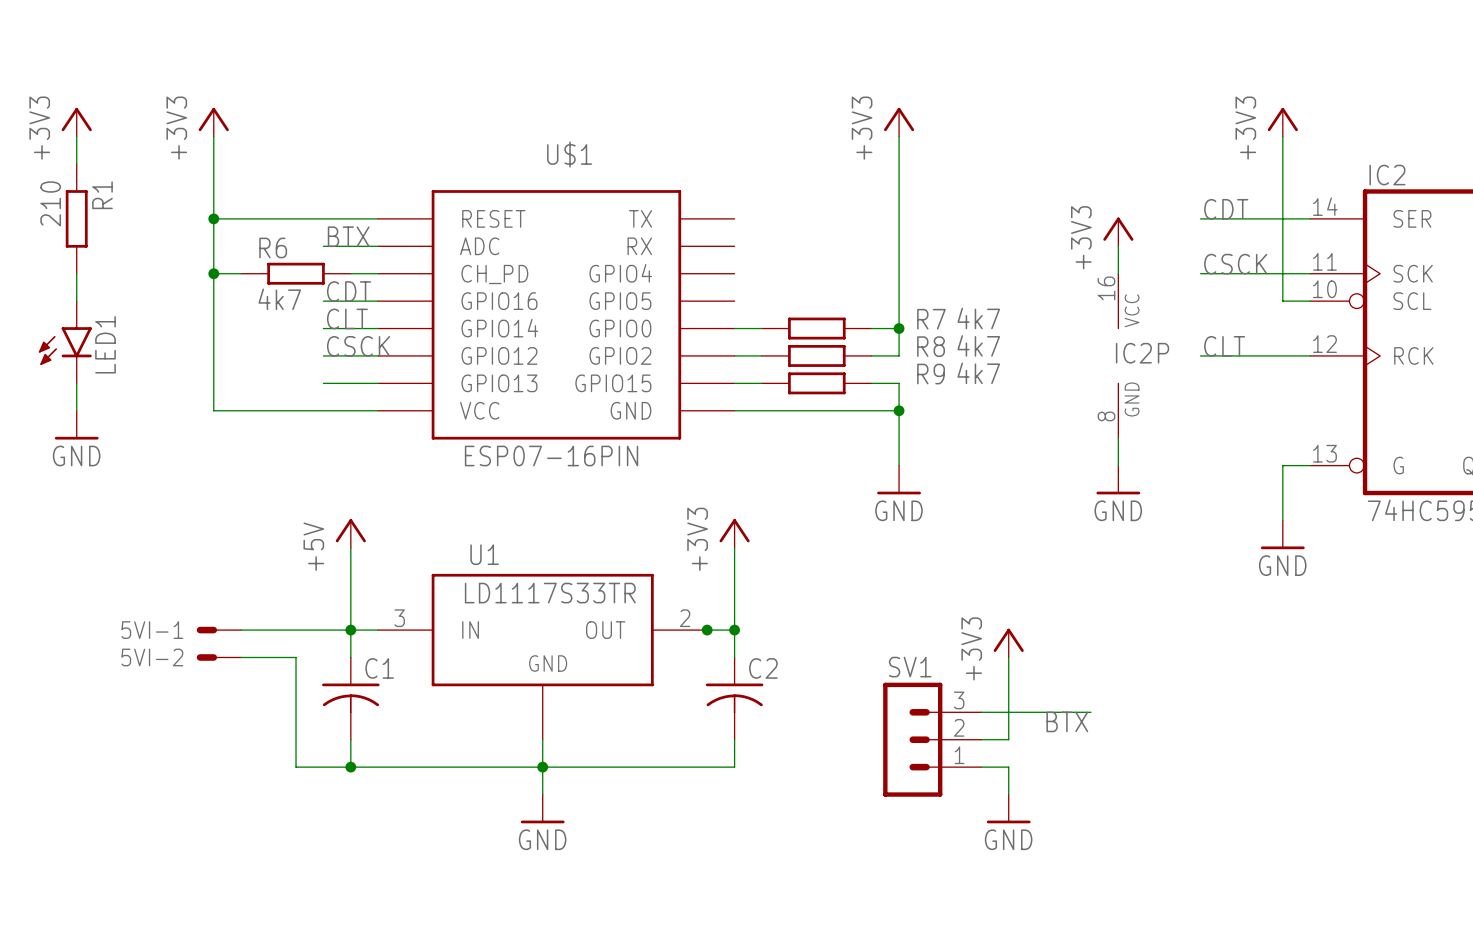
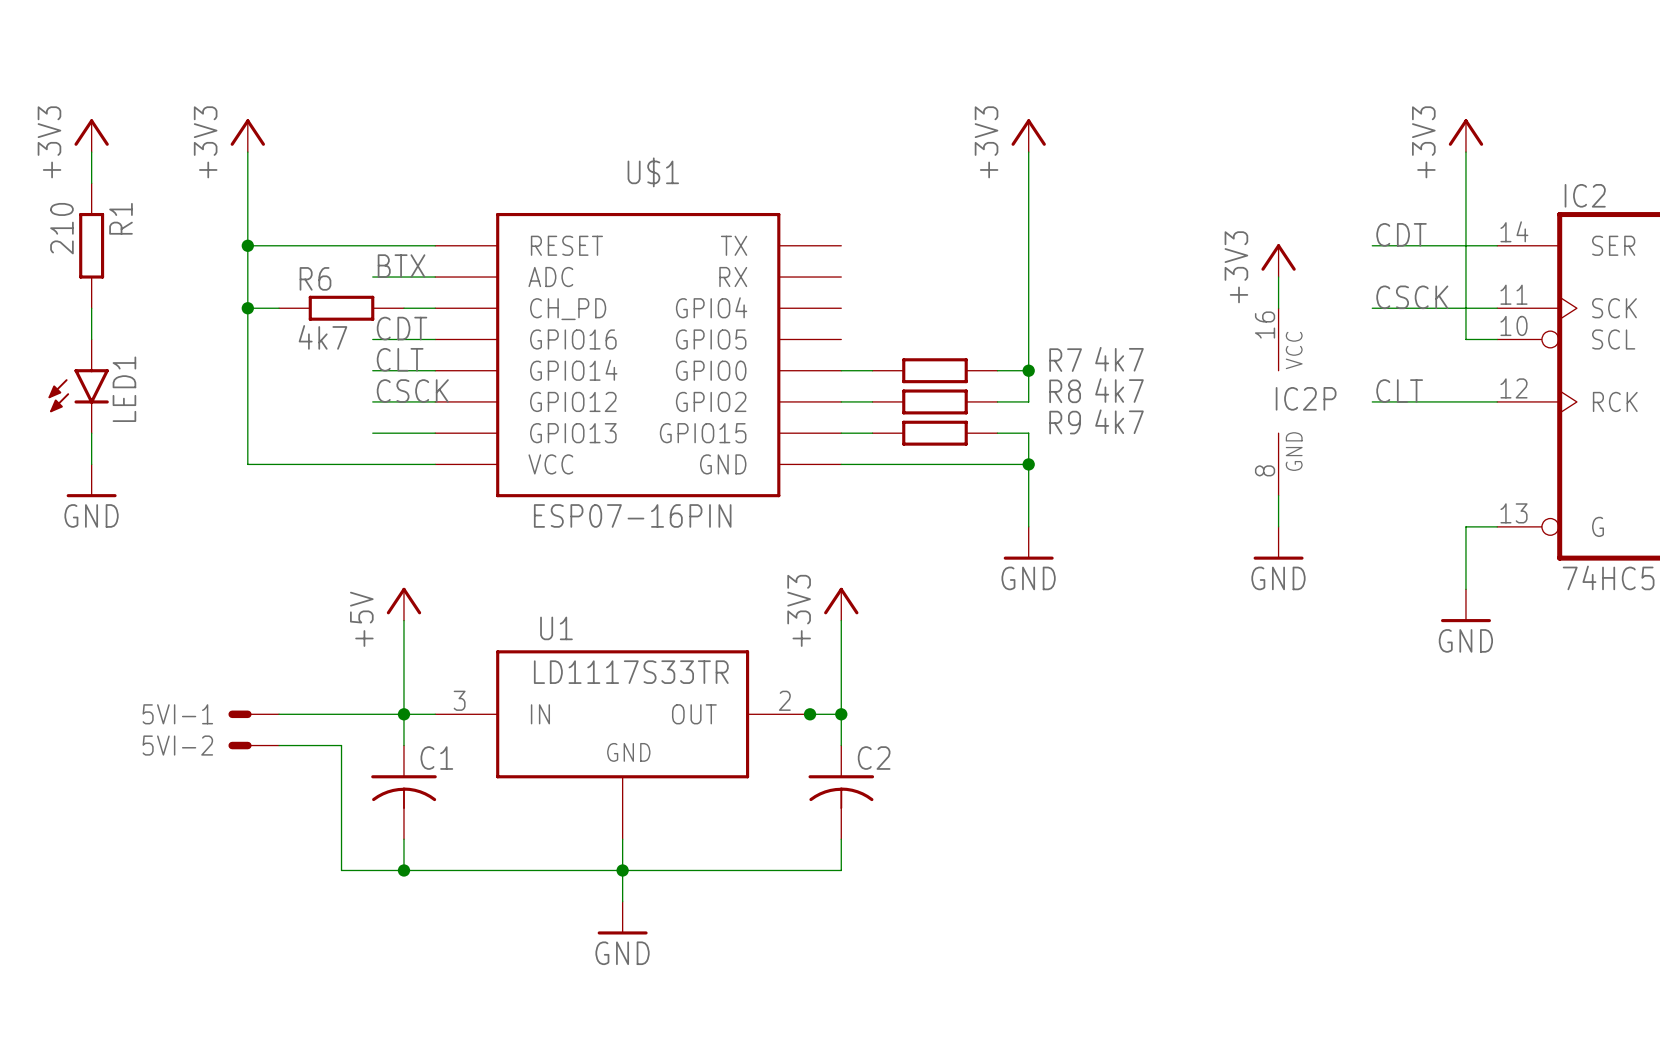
power symbol: +3V3 (1008, 643) -> none
wire: (1008, 657) (1008, 739) (981, 739) -> none
wire: (981, 712) (1090, 712) -> none
label: BTX (1067, 721) -> none
SV1: (932, 739) -> none
wire: (981, 767) (1008, 767) (1008, 794) -> none
power symbol: GND (1008, 808) -> none

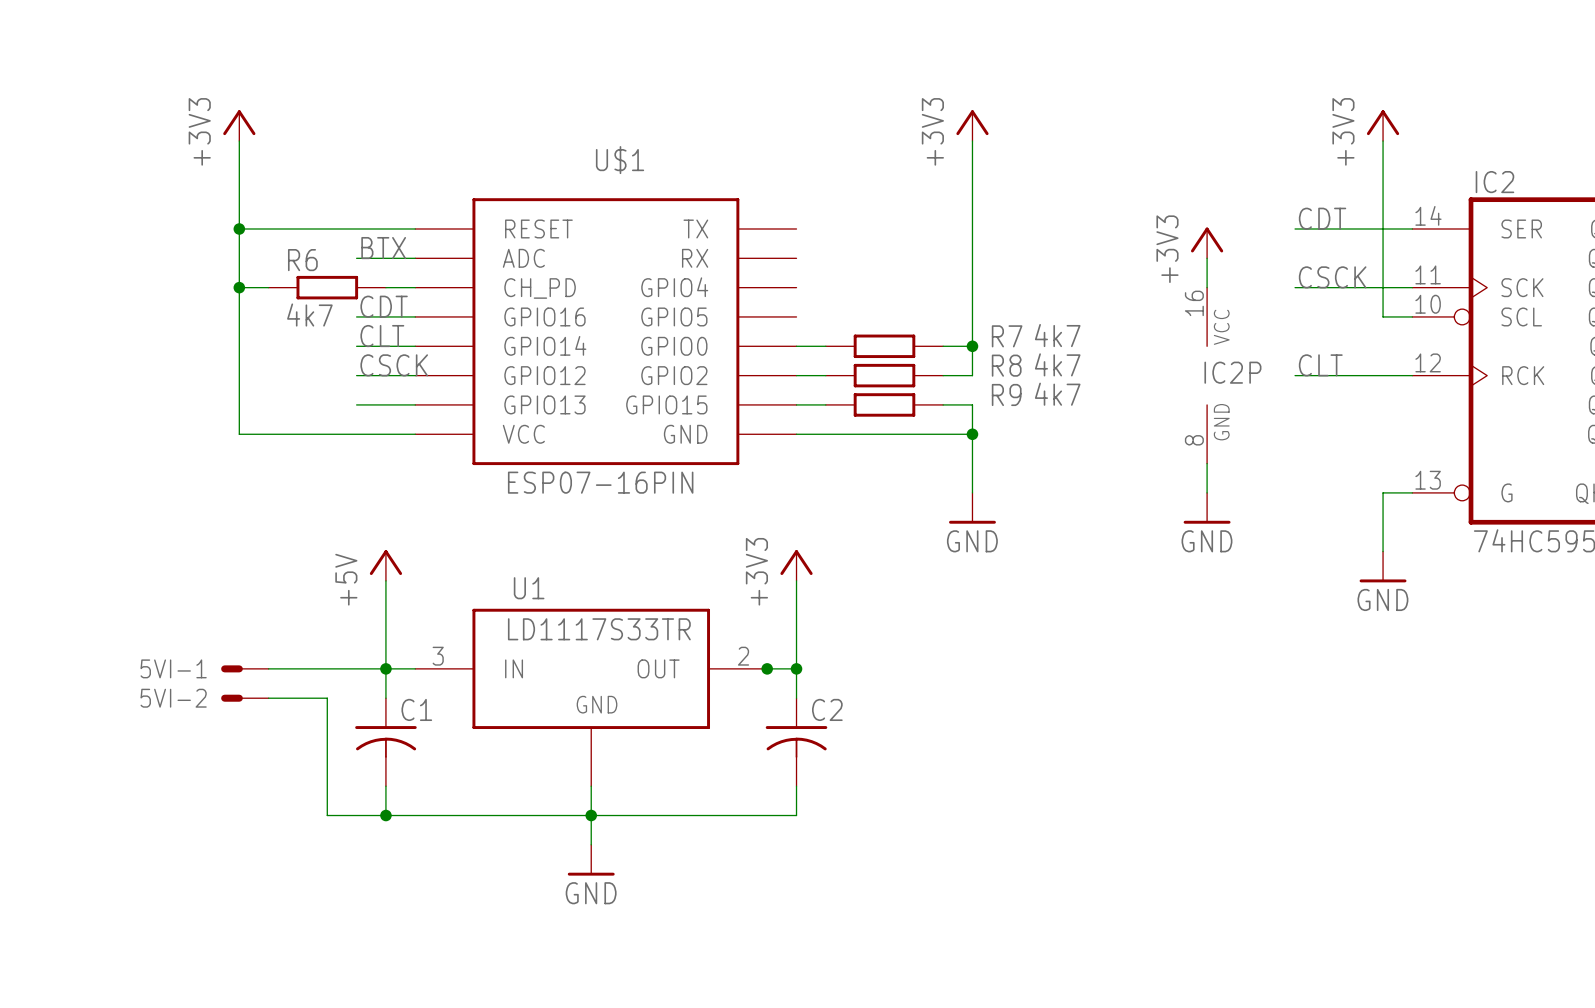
power symbol: +3V3 (91, 135) -> none
wire: (91, 152) (91, 183) -> none
R1: 210 (91, 245) -> none
wire: (91, 308) (91, 339) -> none
LED1: (78, 386) -> none
wire: (91, 433) (91, 464) -> none
power symbol: GND (91, 480) -> none

